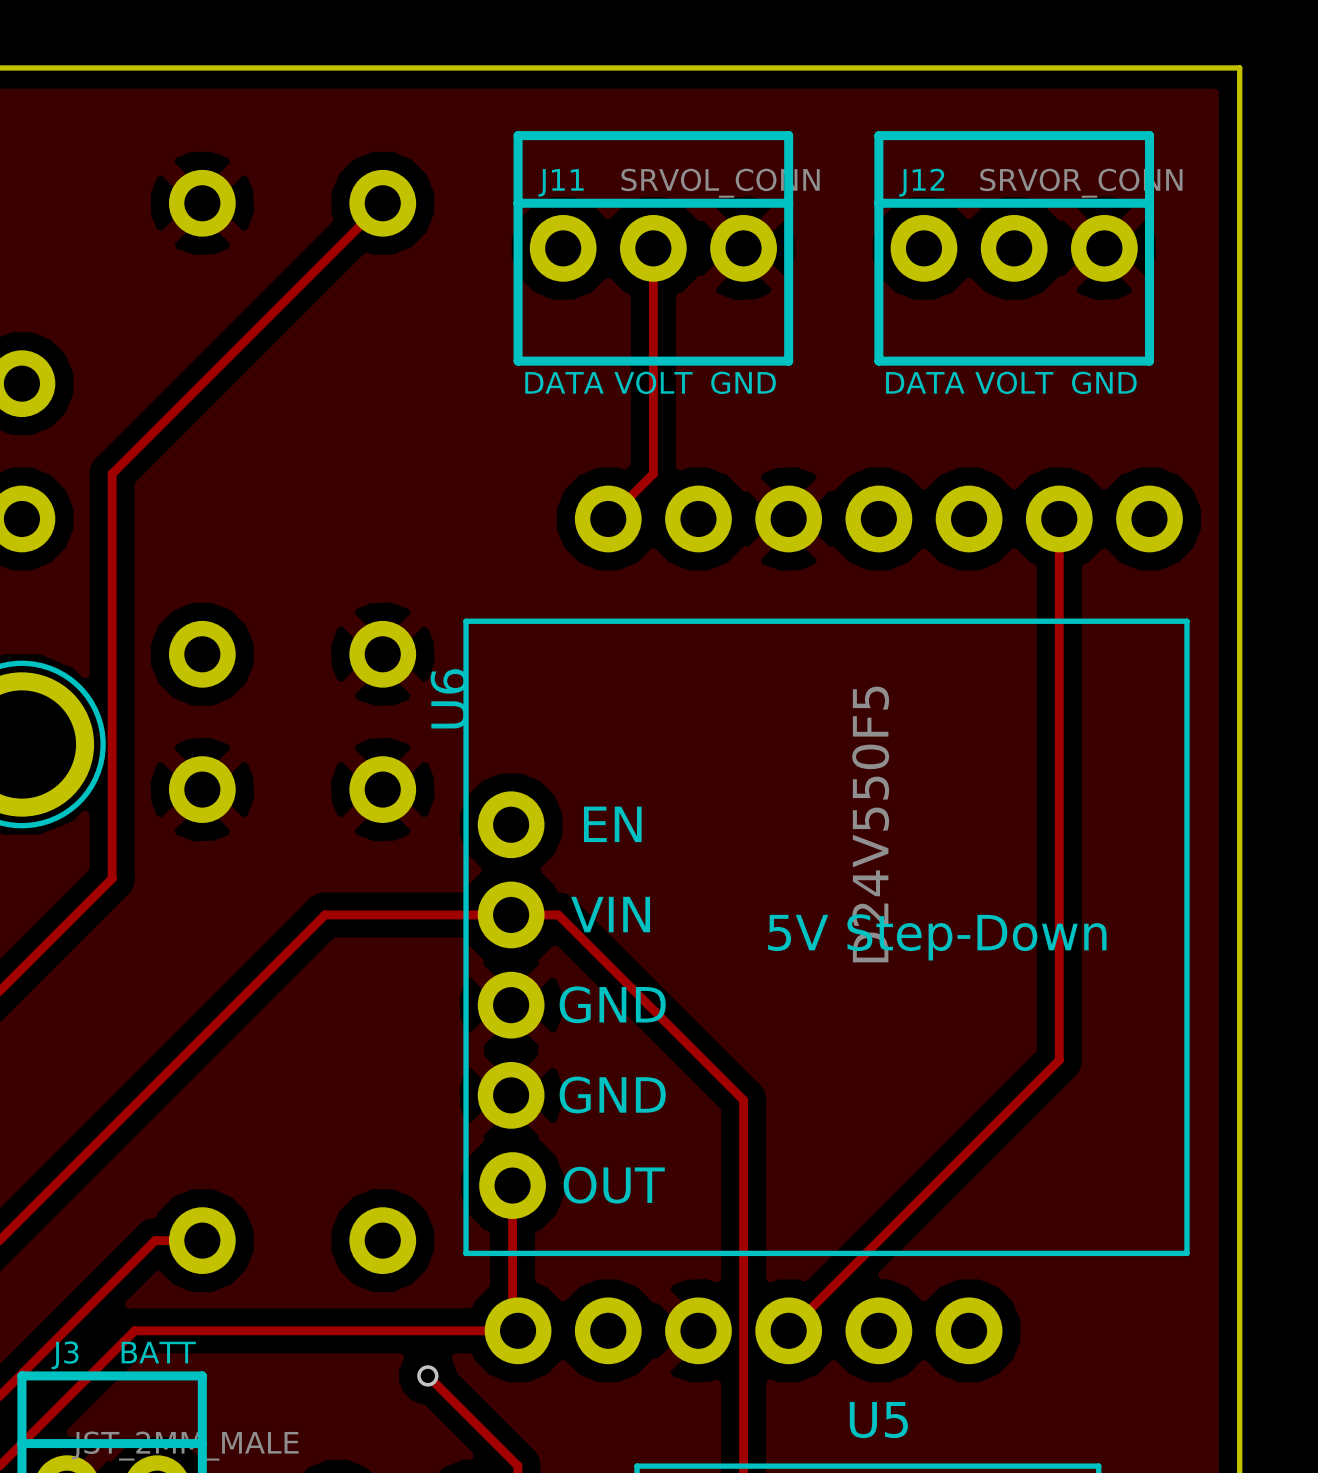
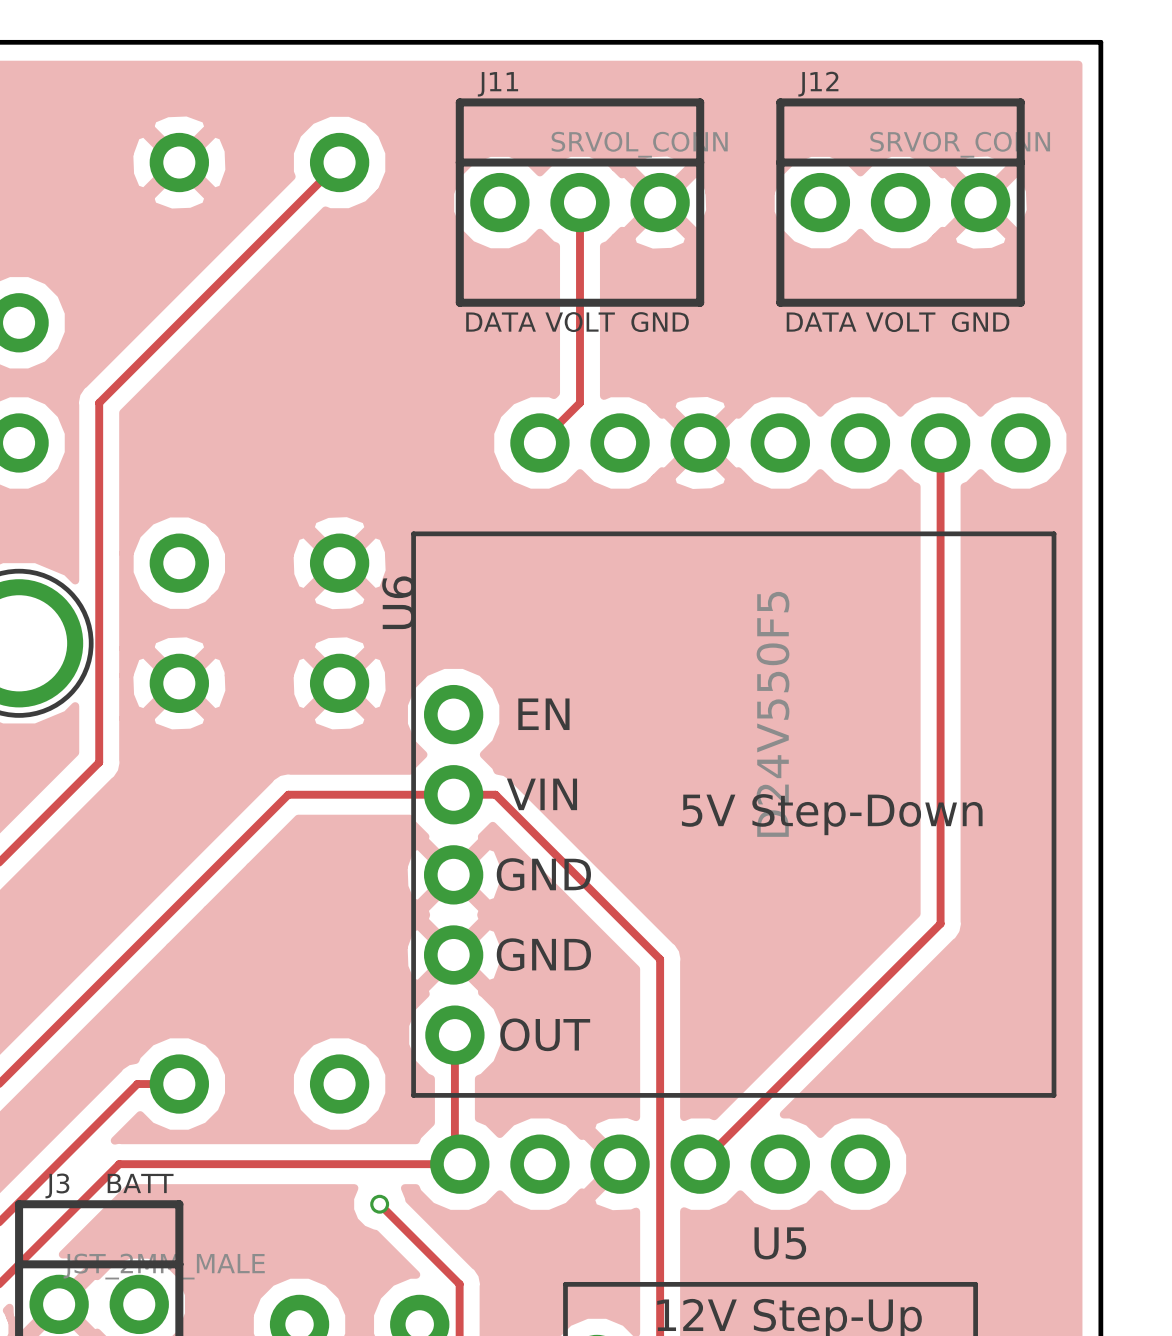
J11 name position: J11 (561, 182) -> J11 (497, 84)
J12 name position: J12 (921, 182) -> J12 (818, 84)

